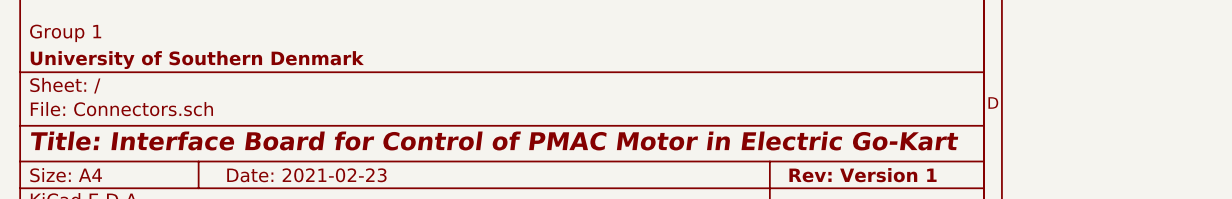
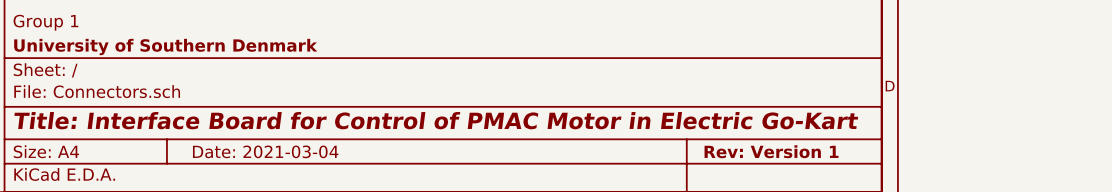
title block: Date: 2021-02-23 (306, 175) -> Date: 2021-03-04 (265, 151)

